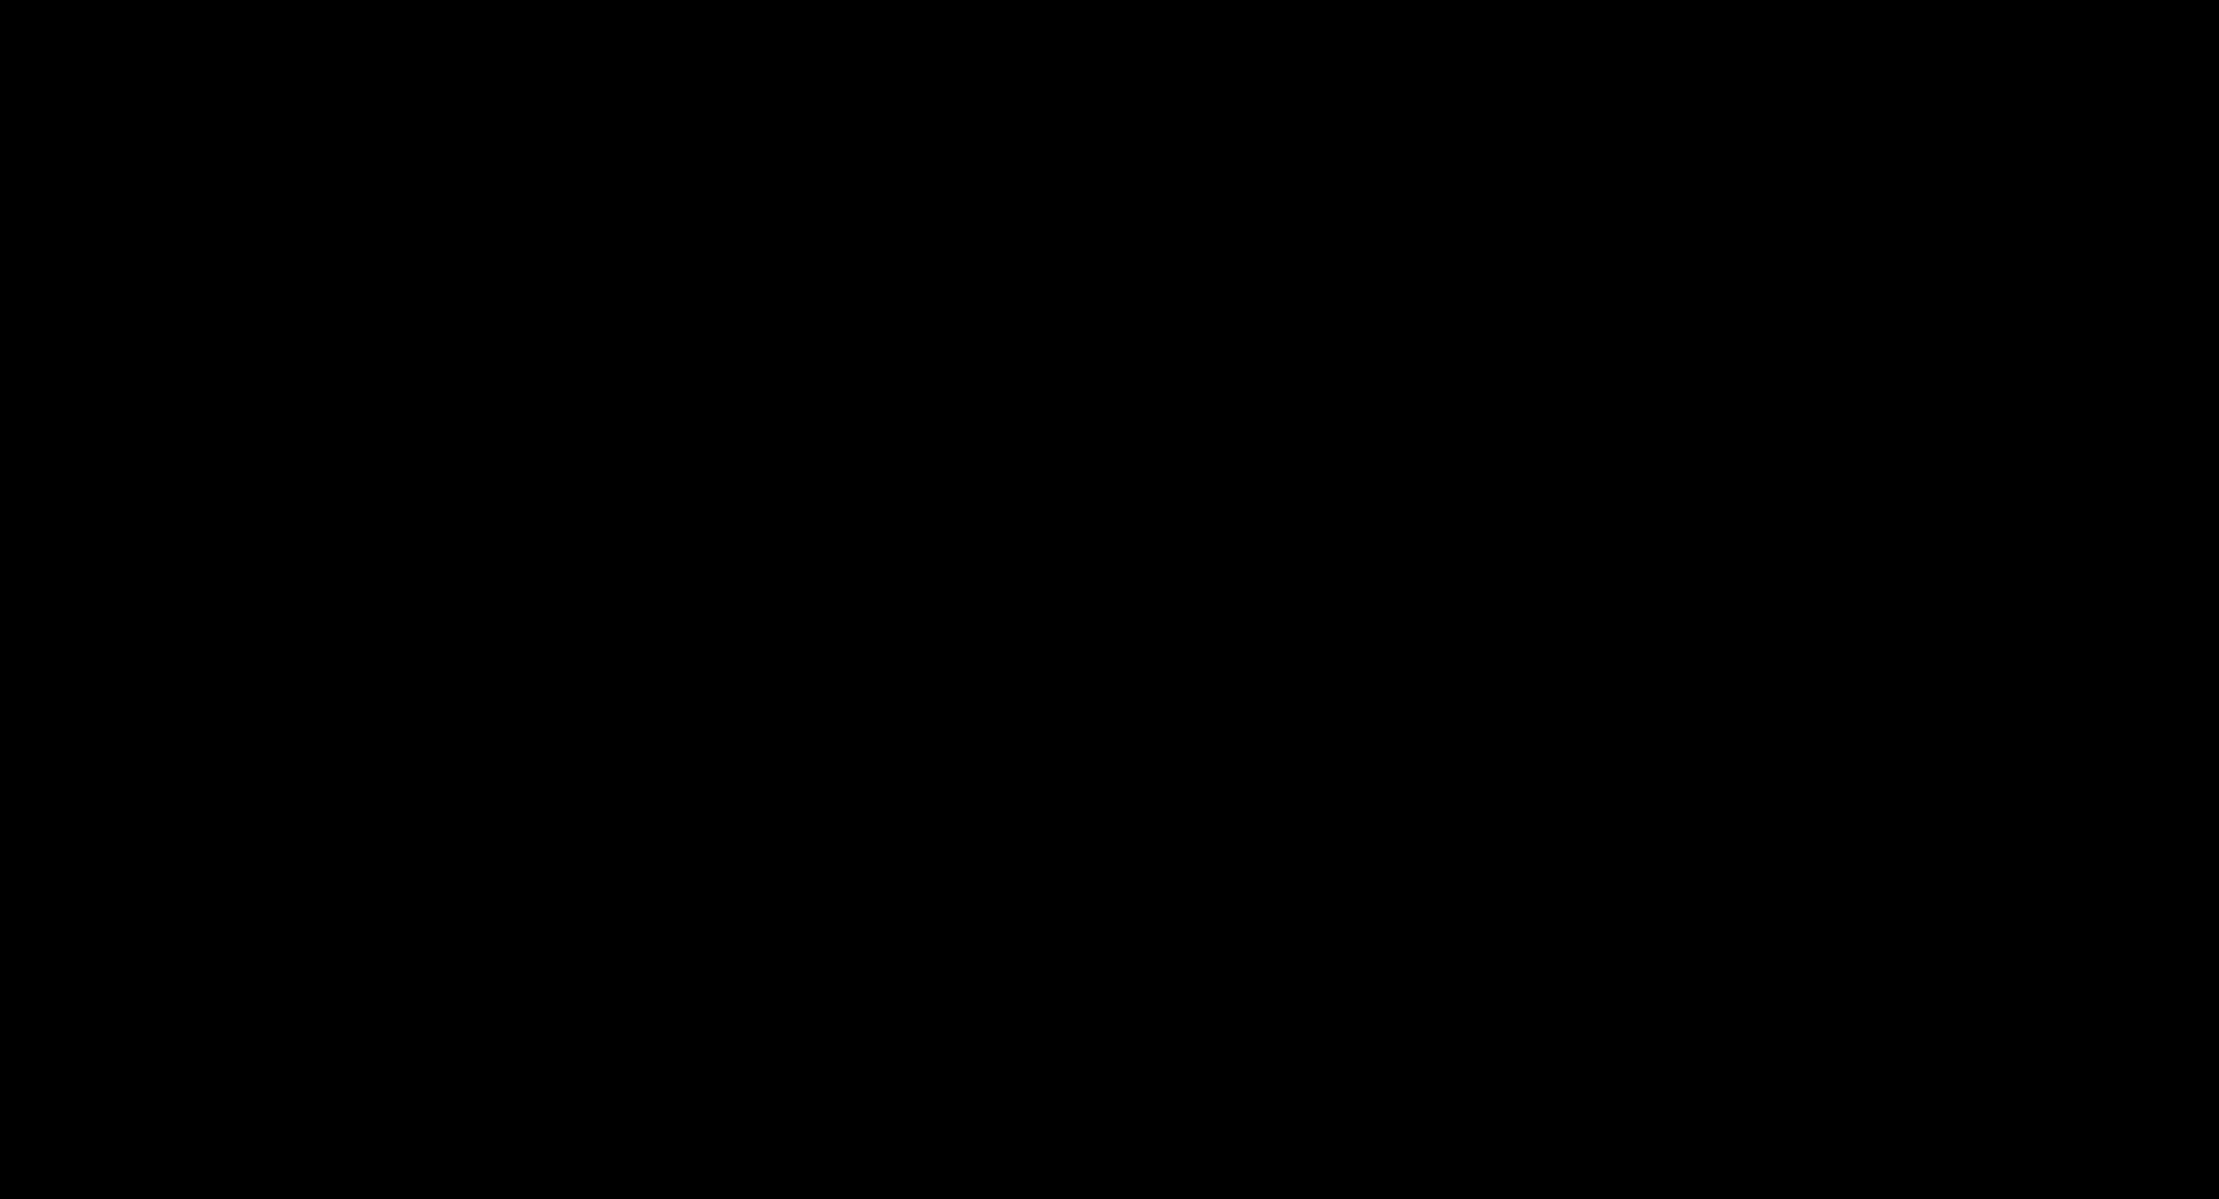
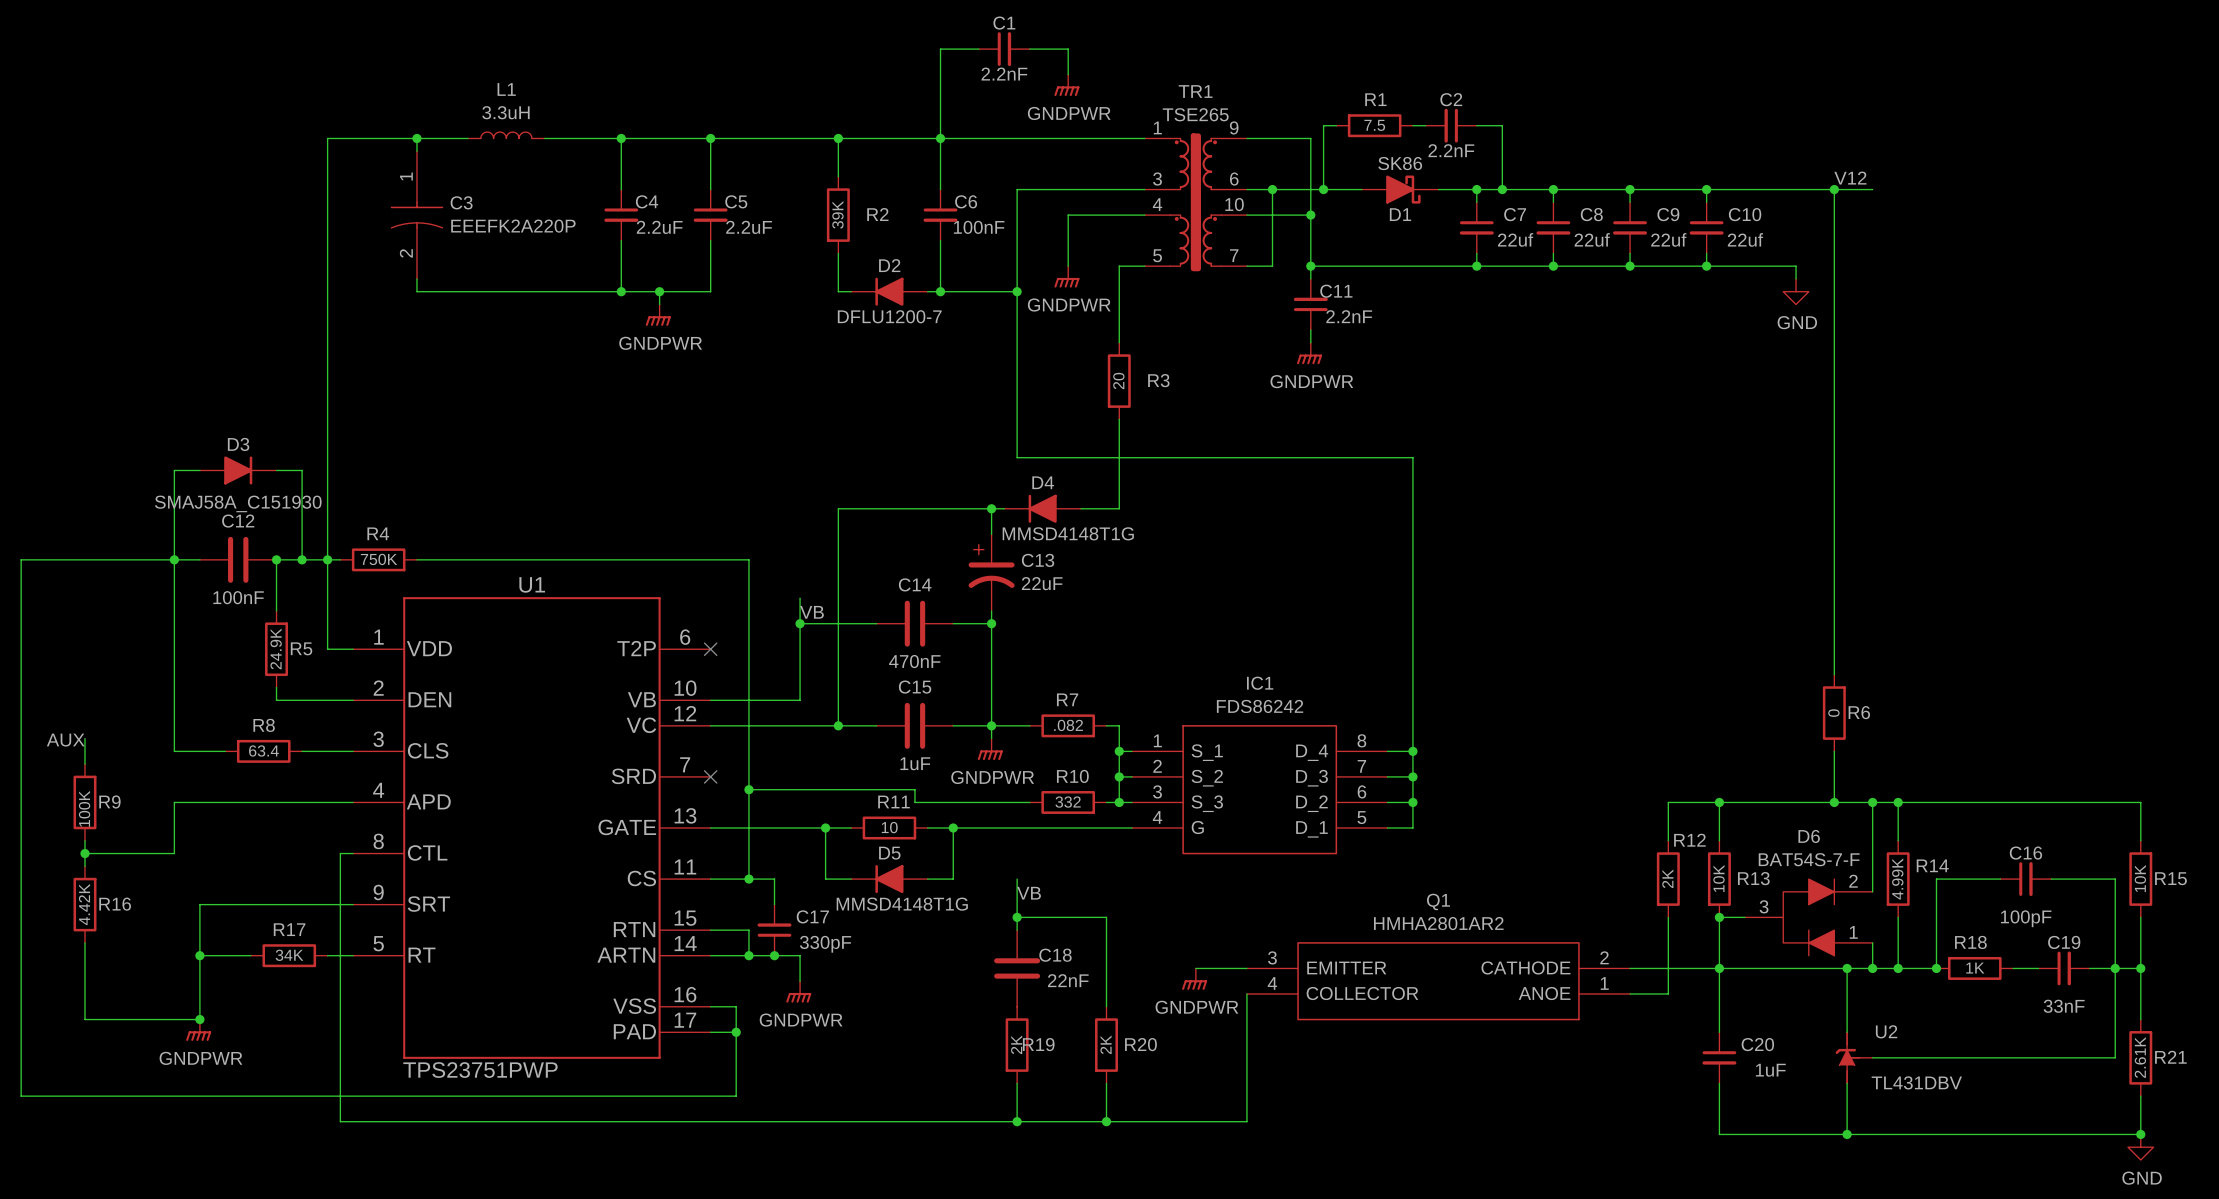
wire: none -> (978, 49) (940, 49) (940, 189)
C1: none -> 2.2nF (1004, 49)
wire: none -> (1029, 49) (1068, 49) (1068, 74)
power symbol: none -> GNDPWR (1066, 85)
wire: none -> (1336, 125) (1323, 125) (1323, 189)
R1: none -> 7.5 (1374, 125)
wire: none -> (1412, 125) (1425, 125)
C2: none -> 2.2nF (1451, 125)
wire: none -> (1476, 125) (1502, 125) (1502, 189)
L1: none -> 3.3uH (506, 135)
wire: none -> (416, 138) (416, 151)
junction: none -> (416, 138)
wire: none -> (468, 138) (327, 138) (327, 649) (353, 649)
wire: none -> (544, 138) (1144, 138)
wire: none -> (621, 138) (621, 189)
junction: none -> (621, 138)
wire: none -> (710, 138) (710, 189)
junction: none -> (710, 138)
wire: none -> (838, 138) (838, 176)
junction: none -> (838, 138)
junction: none -> (940, 138)
wire: none -> (1246, 138) (1310, 138) (1310, 278)
label: none -> V12 (1850, 178)
wire: none -> (1144, 189) (1017, 189) (1017, 457) (1412, 457) (1412, 828) (1387, 828)
wire: none -> (1246, 189) (1361, 189)
wire: none -> (1272, 189) (1272, 266) (1246, 266)
junction: none -> (1272, 189)
junction: none -> (1323, 189)
D1: none -> SK86 (1400, 189)
wire: none -> (1438, 189) (1872, 189)
wire: none -> (1476, 189) (1476, 202)
junction: none -> (1476, 189)
junction: none -> (1502, 189)
wire: none -> (1553, 189) (1553, 202)
junction: none -> (1553, 189)
wire: none -> (1630, 189) (1630, 202)
junction: none -> (1630, 189)
wire: none -> (1706, 189) (1706, 202)
junction: none -> (1706, 189)
wire: none -> (1834, 189) (1834, 674)
junction: none -> (1834, 189)
TR1: none -> TSE265 (1195, 202)
C3: none -> EEEFK2A220P (416, 215)
C4: none -> 2.2uF (621, 215)
C5: none -> 2.2uF (710, 215)
R2: none -> 39K (838, 215)
C6: none -> 100nF (940, 215)
wire: none -> (1144, 215) (1068, 215) (1068, 266)
wire: none -> (1246, 215) (1310, 215)
junction: none -> (1310, 215)
C7: none -> 22uf (1476, 227)
C8: none -> 22uf (1553, 227)
C9: none -> 22uf (1630, 227)
C10: none -> 22uf (1706, 227)
wire: none -> (621, 240) (621, 291)
wire: none -> (710, 240) (710, 291) (416, 291) (416, 278)
wire: none -> (940, 240) (940, 291)
wire: none -> (838, 253) (838, 291) (851, 291)
wire: none -> (1476, 253) (1476, 266)
wire: none -> (1553, 253) (1553, 266)
wire: none -> (1630, 253) (1630, 266)
wire: none -> (1706, 253) (1706, 266)
wire: none -> (1144, 266) (1119, 266) (1119, 342)
wire: none -> (1310, 266) (1796, 266) (1796, 278)
junction: none -> (1310, 266)
junction: none -> (1476, 266)
junction: none -> (1553, 266)
junction: none -> (1630, 266)
junction: none -> (1706, 266)
power symbol: none -> GNDPWR (1066, 276)
junction: none -> (621, 291)
wire: none -> (659, 291) (659, 304)
junction: none -> (659, 291)
D2: none -> DFLU1200-7 (889, 291)
wire: none -> (927, 291) (1017, 291)
junction: none -> (940, 291)
junction: none -> (1017, 291)
power symbol: none -> GND (1796, 291)
C11: none -> 2.2nF (1310, 304)
power symbol: none -> GNDPWR (658, 315)
wire: none -> (1310, 330) (1310, 342)
power symbol: none -> GNDPWR (1309, 353)
R3: none -> 20 (1119, 381)
wire: none -> (1119, 419) (1119, 508) (1080, 508)
wire: none -> (199, 470) (174, 470) (174, 751) (225, 751)
D3: none -> SMAJ58A_C151930 (238, 470)
wire: none -> (276, 470) (302, 470) (302, 559)
wire: none -> (991, 508) (991, 534)
junction: none -> (991, 508)
wire: none -> (1004, 508) (838, 508) (838, 725)
D4: none -> MMSD4148T1G (1042, 508)
junction: none -> (174, 559)
wire: none -> (199, 559) (21, 559) (21, 1096) (736, 1096) (736, 1006) (710, 1006)
C12: none -> 100nF (238, 559)
junction: none -> (276, 559)
junction: none -> (302, 559)
junction: none -> (327, 559)
wire: none -> (340, 559) (276, 559) (276, 610)
R4: none -> 750K (378, 559)
wire: none -> (416, 559) (748, 559) (748, 879)
C13: none -> 22uF (991, 572)
wire: none -> (800, 598) (800, 700) (710, 700)
wire: none -> (991, 610) (991, 738)
label: none -> VB (811, 612)
wire: none -> (800, 623) (876, 623)
junction: none -> (800, 623)
C14: none -> 470nF (914, 623)
wire: none -> (953, 623) (991, 623)
junction: none -> (991, 623)
R5: none -> 24.9K (276, 649)
no-connect mark: none -> (710, 649)
wire: none -> (276, 687) (276, 700) (353, 700)
R6: none -> 0 (1834, 713)
wire: none -> (710, 725) (876, 725)
junction: none -> (838, 725)
C15: none -> 1uF (914, 725)
wire: none -> (953, 725) (1029, 725)
junction: none -> (991, 725)
R7: none -> .082 (1068, 725)
wire: none -> (1106, 725) (1119, 725) (1119, 802)
wire: none -> (84, 738) (84, 764)
label: none -> AUX (65, 740)
power symbol: none -> GNDPWR (990, 749)
R8: none -> 63.4 (263, 751)
wire: none -> (302, 751) (353, 751)
wire: none -> (1119, 751) (1132, 751)
junction: none -> (1119, 751)
wire: none -> (1387, 751) (1412, 751)
junction: none -> (1412, 751)
wire: none -> (1834, 751) (1834, 802)
no-connect mark: none -> (710, 776)
wire: none -> (1119, 776) (1132, 776)
junction: none -> (1119, 776)
wire: none -> (1387, 776) (1412, 776)
junction: none -> (1412, 776)
wire: none -> (748, 789) (914, 789) (914, 802) (1029, 802)
junction: none -> (748, 789)
IC1: none -> FDS86242 (1259, 789)
R9: none -> 100K (84, 802)
wire: none -> (353, 802) (174, 802) (174, 853) (84, 853)
R10: none -> 332 (1068, 802)
wire: none -> (1106, 802) (1132, 802)
junction: none -> (1119, 802)
wire: none -> (1387, 802) (1412, 802)
junction: none -> (1412, 802)
wire: none -> (1719, 802) (1719, 840)
junction: none -> (1719, 802)
junction: none -> (1834, 802)
wire: none -> (1872, 802) (1872, 891)
junction: none -> (1872, 802)
wire: none -> (1898, 802) (1898, 840)
junction: none -> (1898, 802)
U1: none -> TPS23751PWP (531, 828)
wire: none -> (710, 828) (851, 828)
wire: none -> (825, 828) (825, 879) (851, 879)
junction: none -> (825, 828)
R11: none -> 10 (889, 828)
wire: none -> (927, 828) (1132, 828)
wire: none -> (953, 828) (953, 879) (927, 879)
junction: none -> (953, 828)
wire: none -> (84, 840) (84, 866)
wire: none -> (1668, 840) (1668, 802) (2140, 802) (2140, 840)
junction: none -> (84, 853)
wire: none -> (353, 853) (340, 853) (340, 1121) (1246, 1121) (1246, 994)
wire: none -> (710, 879) (774, 879) (774, 904)
junction: none -> (748, 879)
D5: none -> MMSD4148T1G (889, 879)
wire: none -> (1017, 879) (1017, 930)
R12: none -> 2K (1668, 879)
R13: none -> 10K (1719, 879)
R14: none -> 4.99K (1898, 879)
wire: none -> (2000, 879) (1936, 879) (1936, 968) (1630, 968)
C16: none -> 100pF (2025, 879)
wire: none -> (2051, 879) (2115, 879) (2115, 1057) (1872, 1057)
R15: none -> 10K (2140, 879)
label: none -> VB (1029, 893)
R16: none -> 4.42K (84, 904)
wire: none -> (353, 904) (199, 904) (199, 1019) (84, 1019) (84, 942)
wire: none -> (1017, 917) (1106, 917) (1106, 1006)
junction: none -> (1017, 917)
wire: none -> (1668, 917) (1668, 994) (1630, 994)
junction: none -> (1719, 917)
wire: none -> (1744, 917) (1719, 917) (1719, 1032)
D6: none -> BAT54S-7-F (1808, 917)
wire: none -> (1898, 917) (1898, 968)
wire: none -> (2140, 917) (2140, 1019)
wire: none -> (710, 930) (748, 930) (748, 955)
C17: none -> 330pF (774, 930)
wire: none -> (1872, 942) (1872, 968)
wire: none -> (199, 955) (250, 955)
junction: none -> (199, 955)
R17: none -> 34K (289, 955)
wire: none -> (327, 955) (353, 955)
wire: none -> (710, 955) (800, 955) (800, 981)
junction: none -> (748, 955)
junction: none -> (774, 955)
C18: none -> 22nF (1017, 968)
wire: none -> (1195, 968) (1246, 968)
junction: none -> (1719, 968)
wire: none -> (1847, 968) (1847, 1032)
junction: none -> (1847, 968)
junction: none -> (1872, 968)
junction: none -> (1898, 968)
junction: none -> (1936, 968)
R18: none -> 1K (1974, 968)
wire: none -> (2013, 968) (2038, 968)
C19: none -> 33nF (2064, 968)
wire: none -> (2089, 968) (2140, 968)
junction: none -> (2115, 968)
junction: none -> (2140, 968)
power symbol: none -> GNDPWR (1194, 979)
Q1: none -> HMHA2801AR2 (1438, 981)
power symbol: none -> GNDPWR (798, 991)
junction: none -> (199, 1019)
power symbol: none -> GNDPWR (198, 1030)
wire: none -> (710, 1032) (736, 1032)
junction: none -> (736, 1032)
R19: none -> 2K (1017, 1045)
R20: none -> 2K (1106, 1045)
C20: none -> 1uF (1719, 1057)
U2: none -> TL431DBV (1854, 1057)
R21: none -> 2.61K (2140, 1057)
wire: none -> (1017, 1083) (1017, 1121)
wire: none -> (1106, 1083) (1106, 1121)
wire: none -> (1719, 1083) (1719, 1134) (2140, 1134) (2140, 1096)
wire: none -> (1847, 1083) (1847, 1134)
junction: none -> (1017, 1121)
junction: none -> (1106, 1121)
junction: none -> (1847, 1134)
junction: none -> (2140, 1134)
power symbol: none -> GND (2140, 1147)

